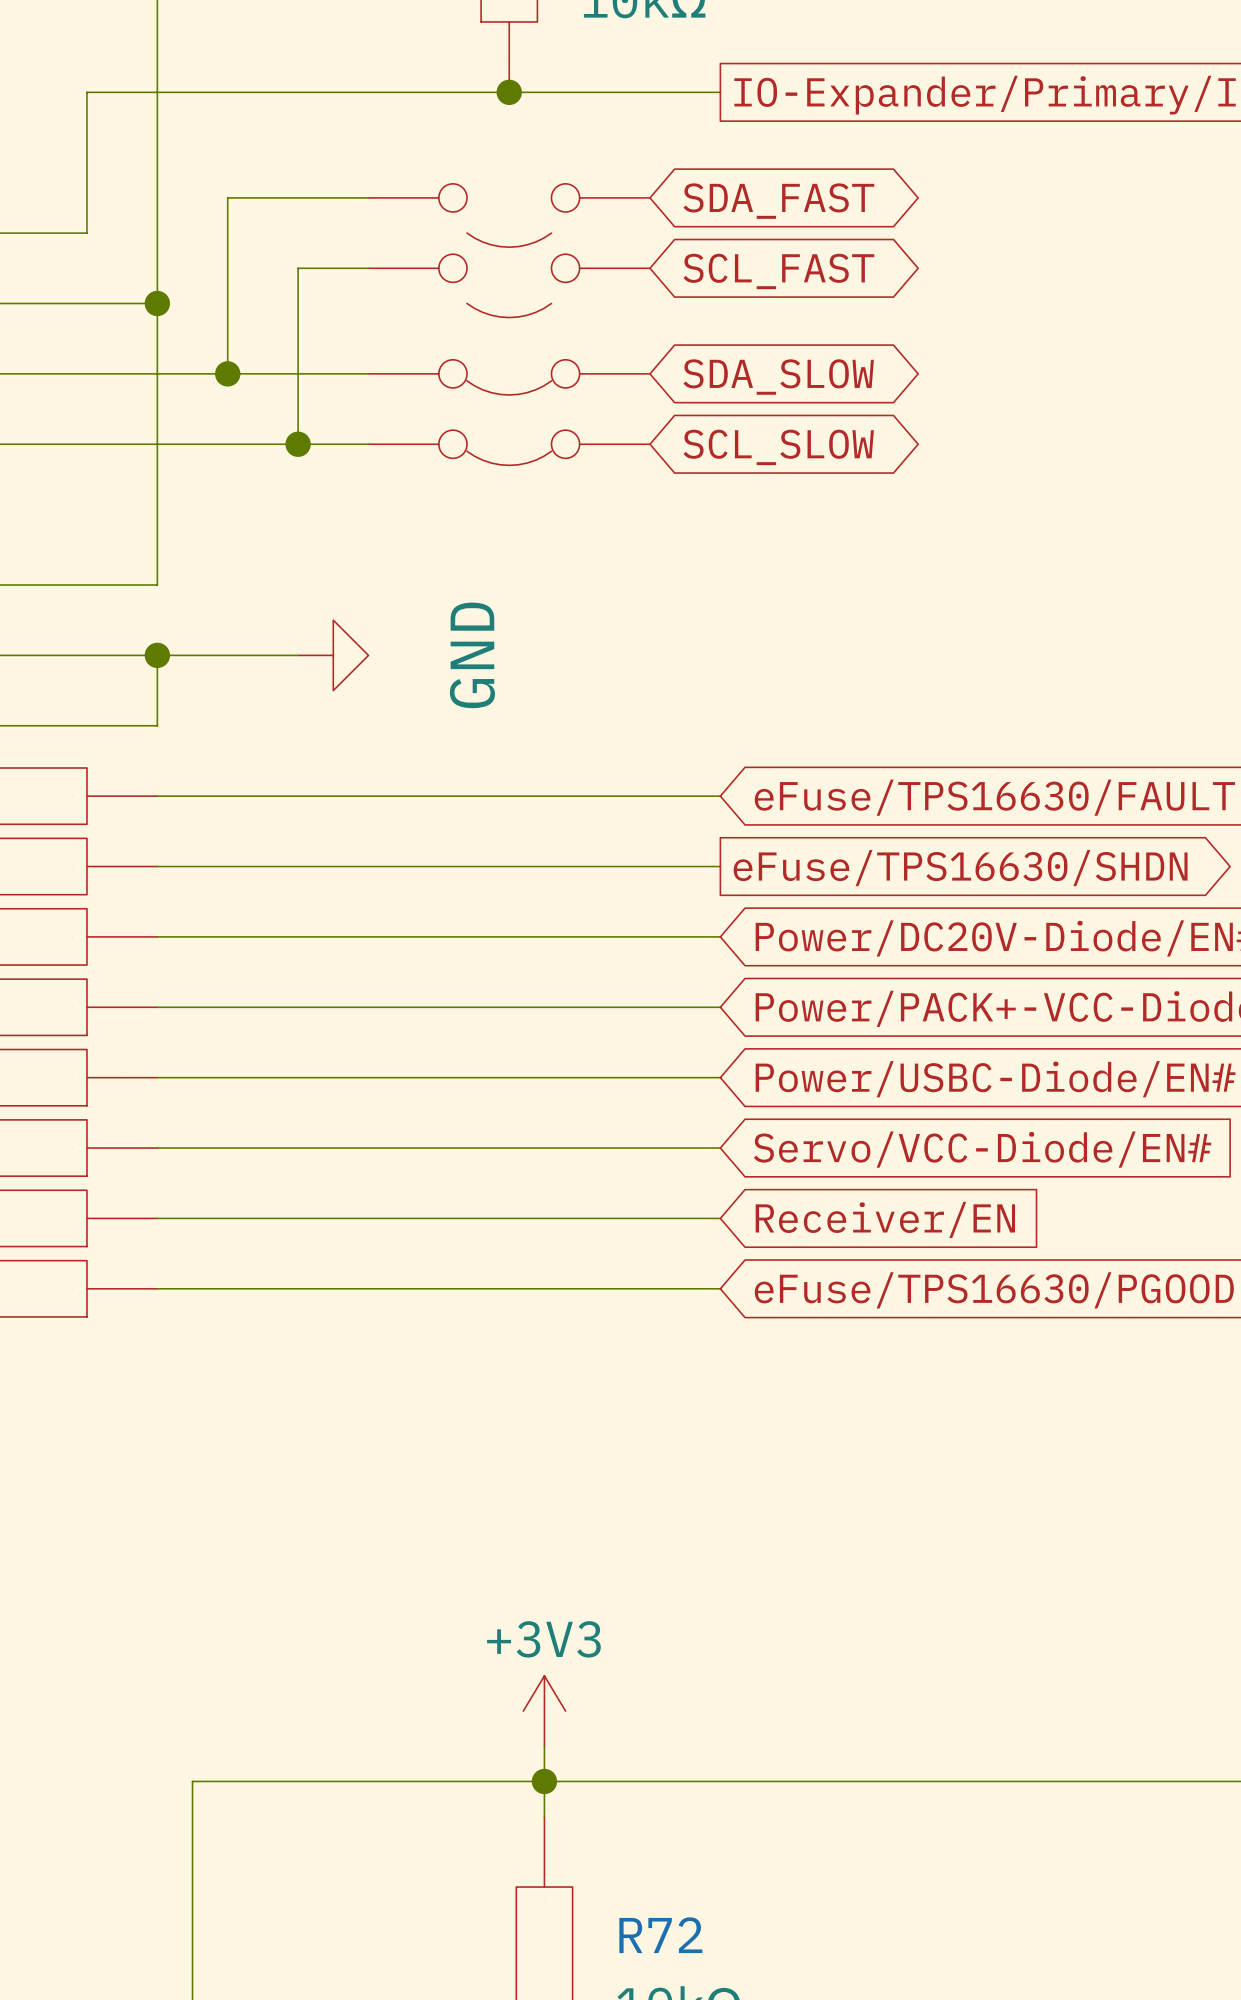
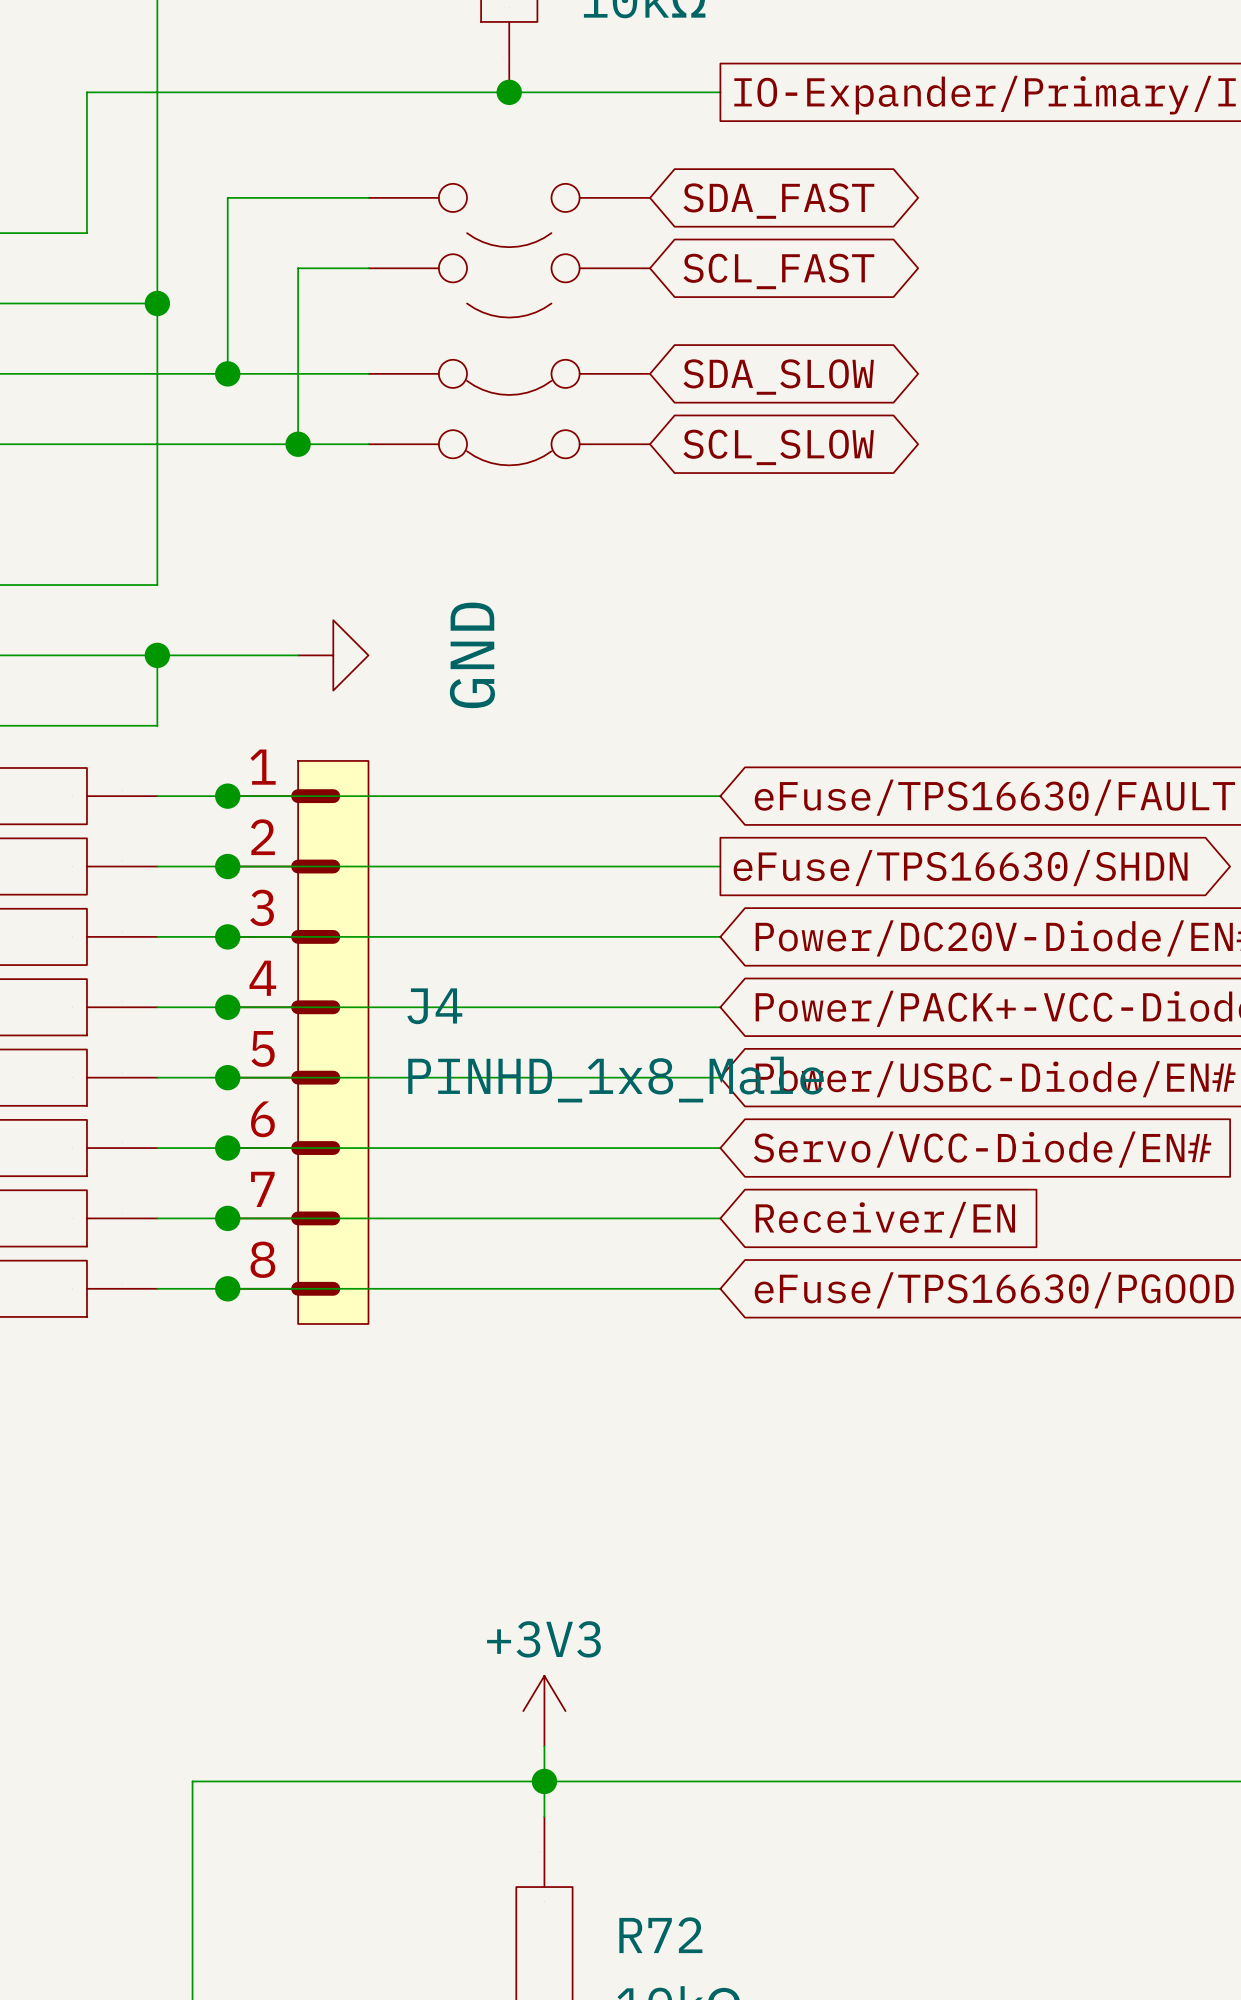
junction: none -> (227, 796)
junction: none -> (227, 866)
junction: none -> (227, 936)
junction: none -> (227, 1007)
J4: none -> PINHD_1x8_Male (298, 1042)
junction: none -> (227, 1077)
junction: none -> (227, 1148)
junction: none -> (227, 1218)
junction: none -> (227, 1288)

